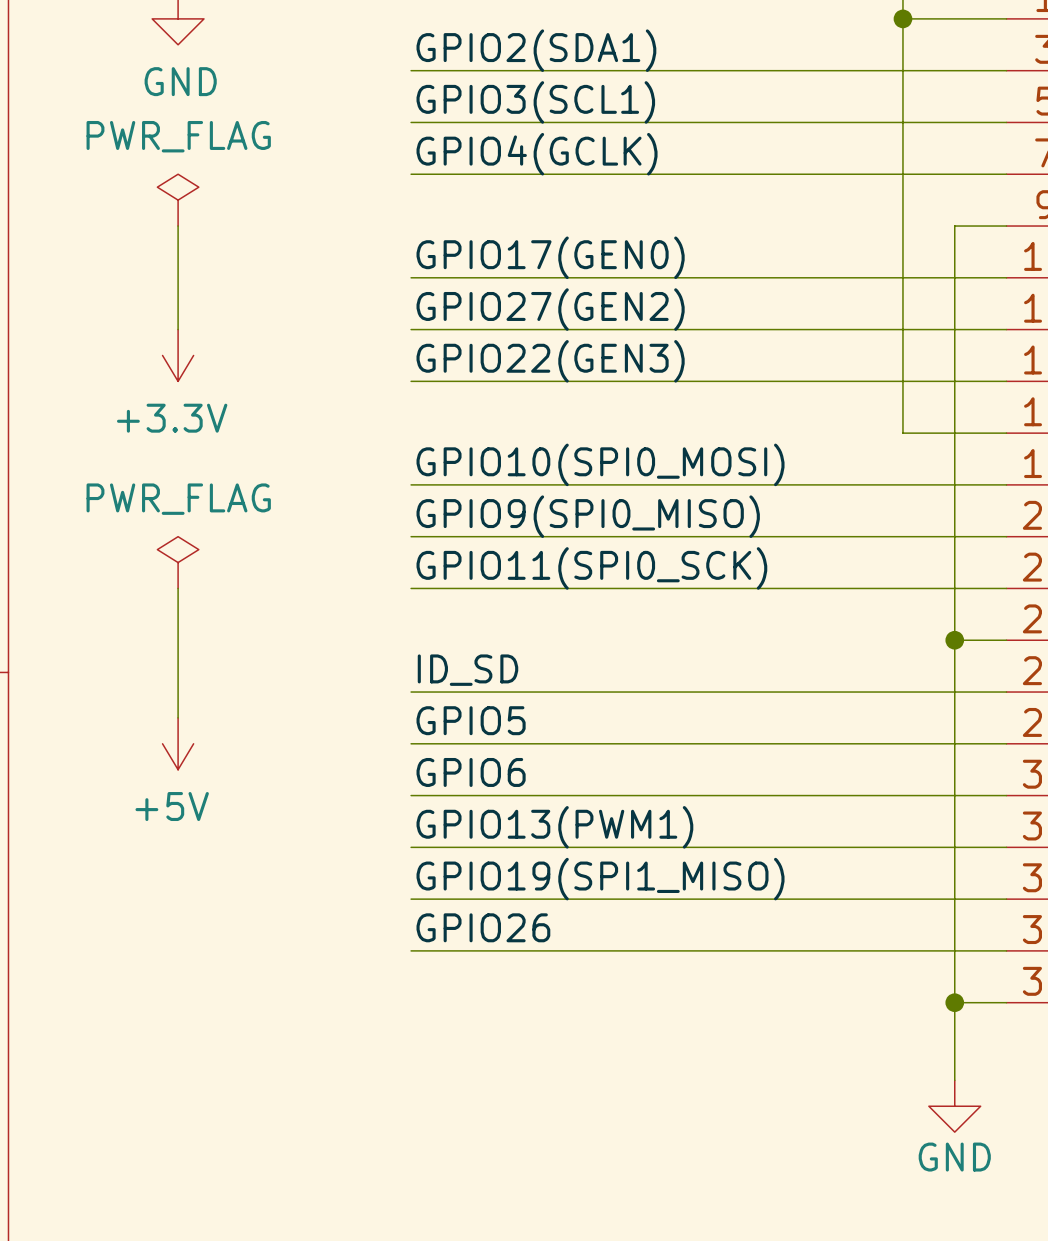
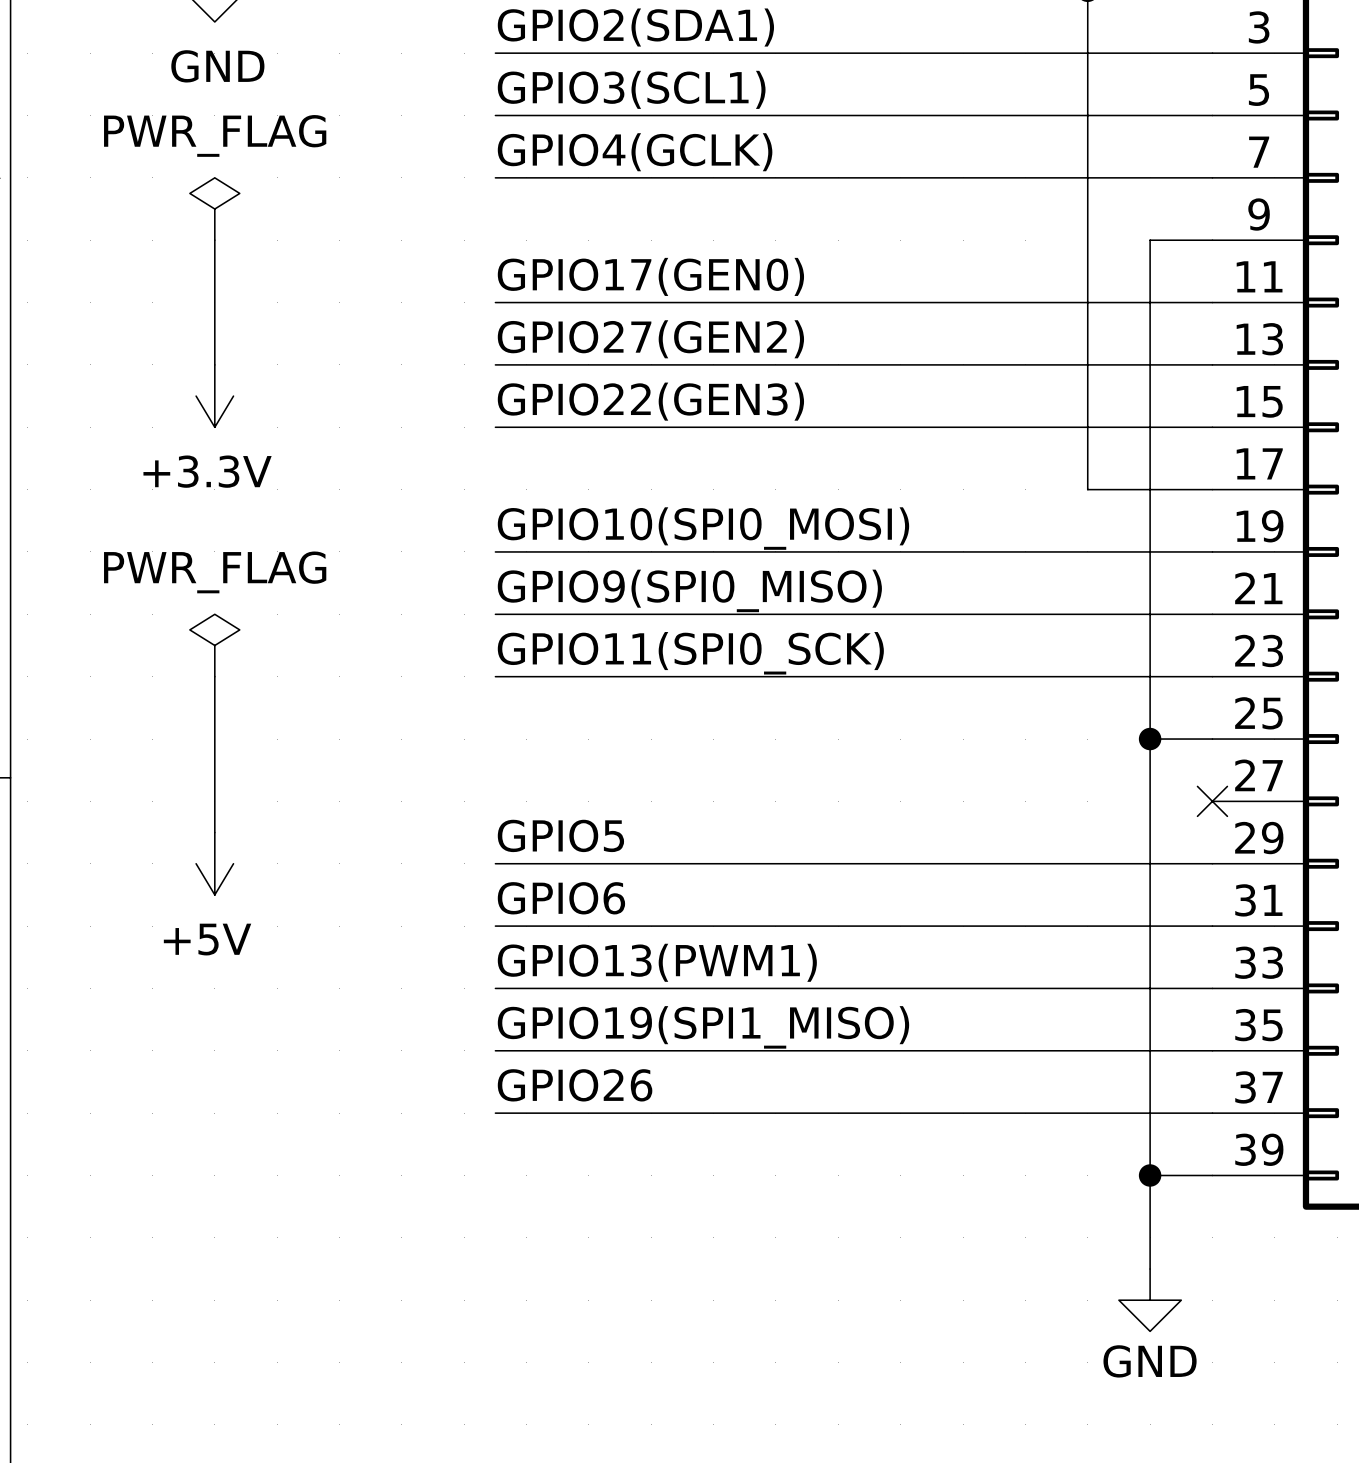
label: ID_SD (467, 670) -> none
wire: (411, 692) (1006, 692) -> none
no-connect mark: none -> (1212, 801)

